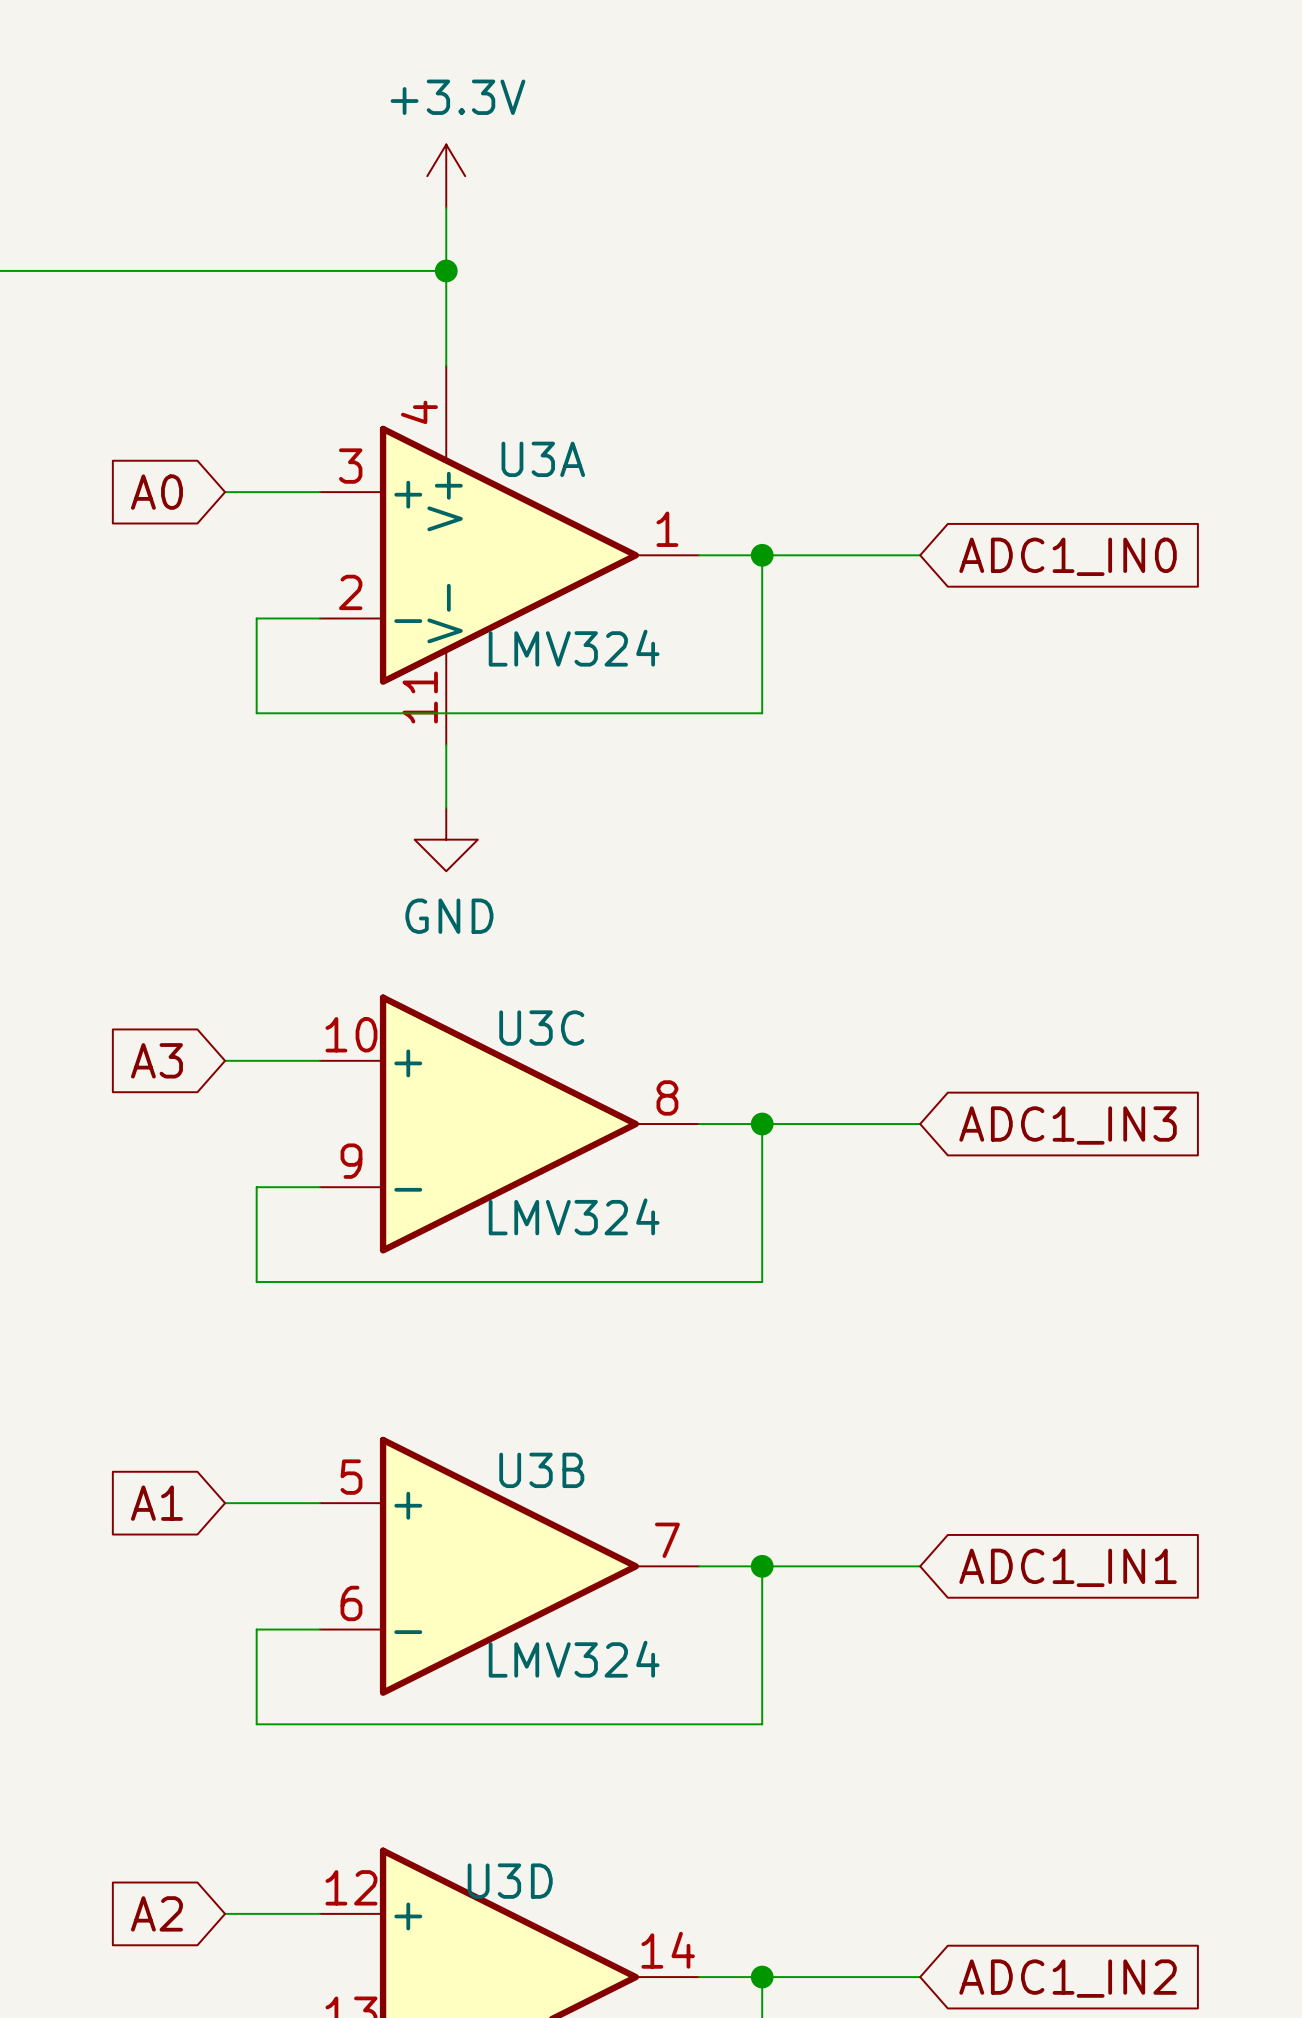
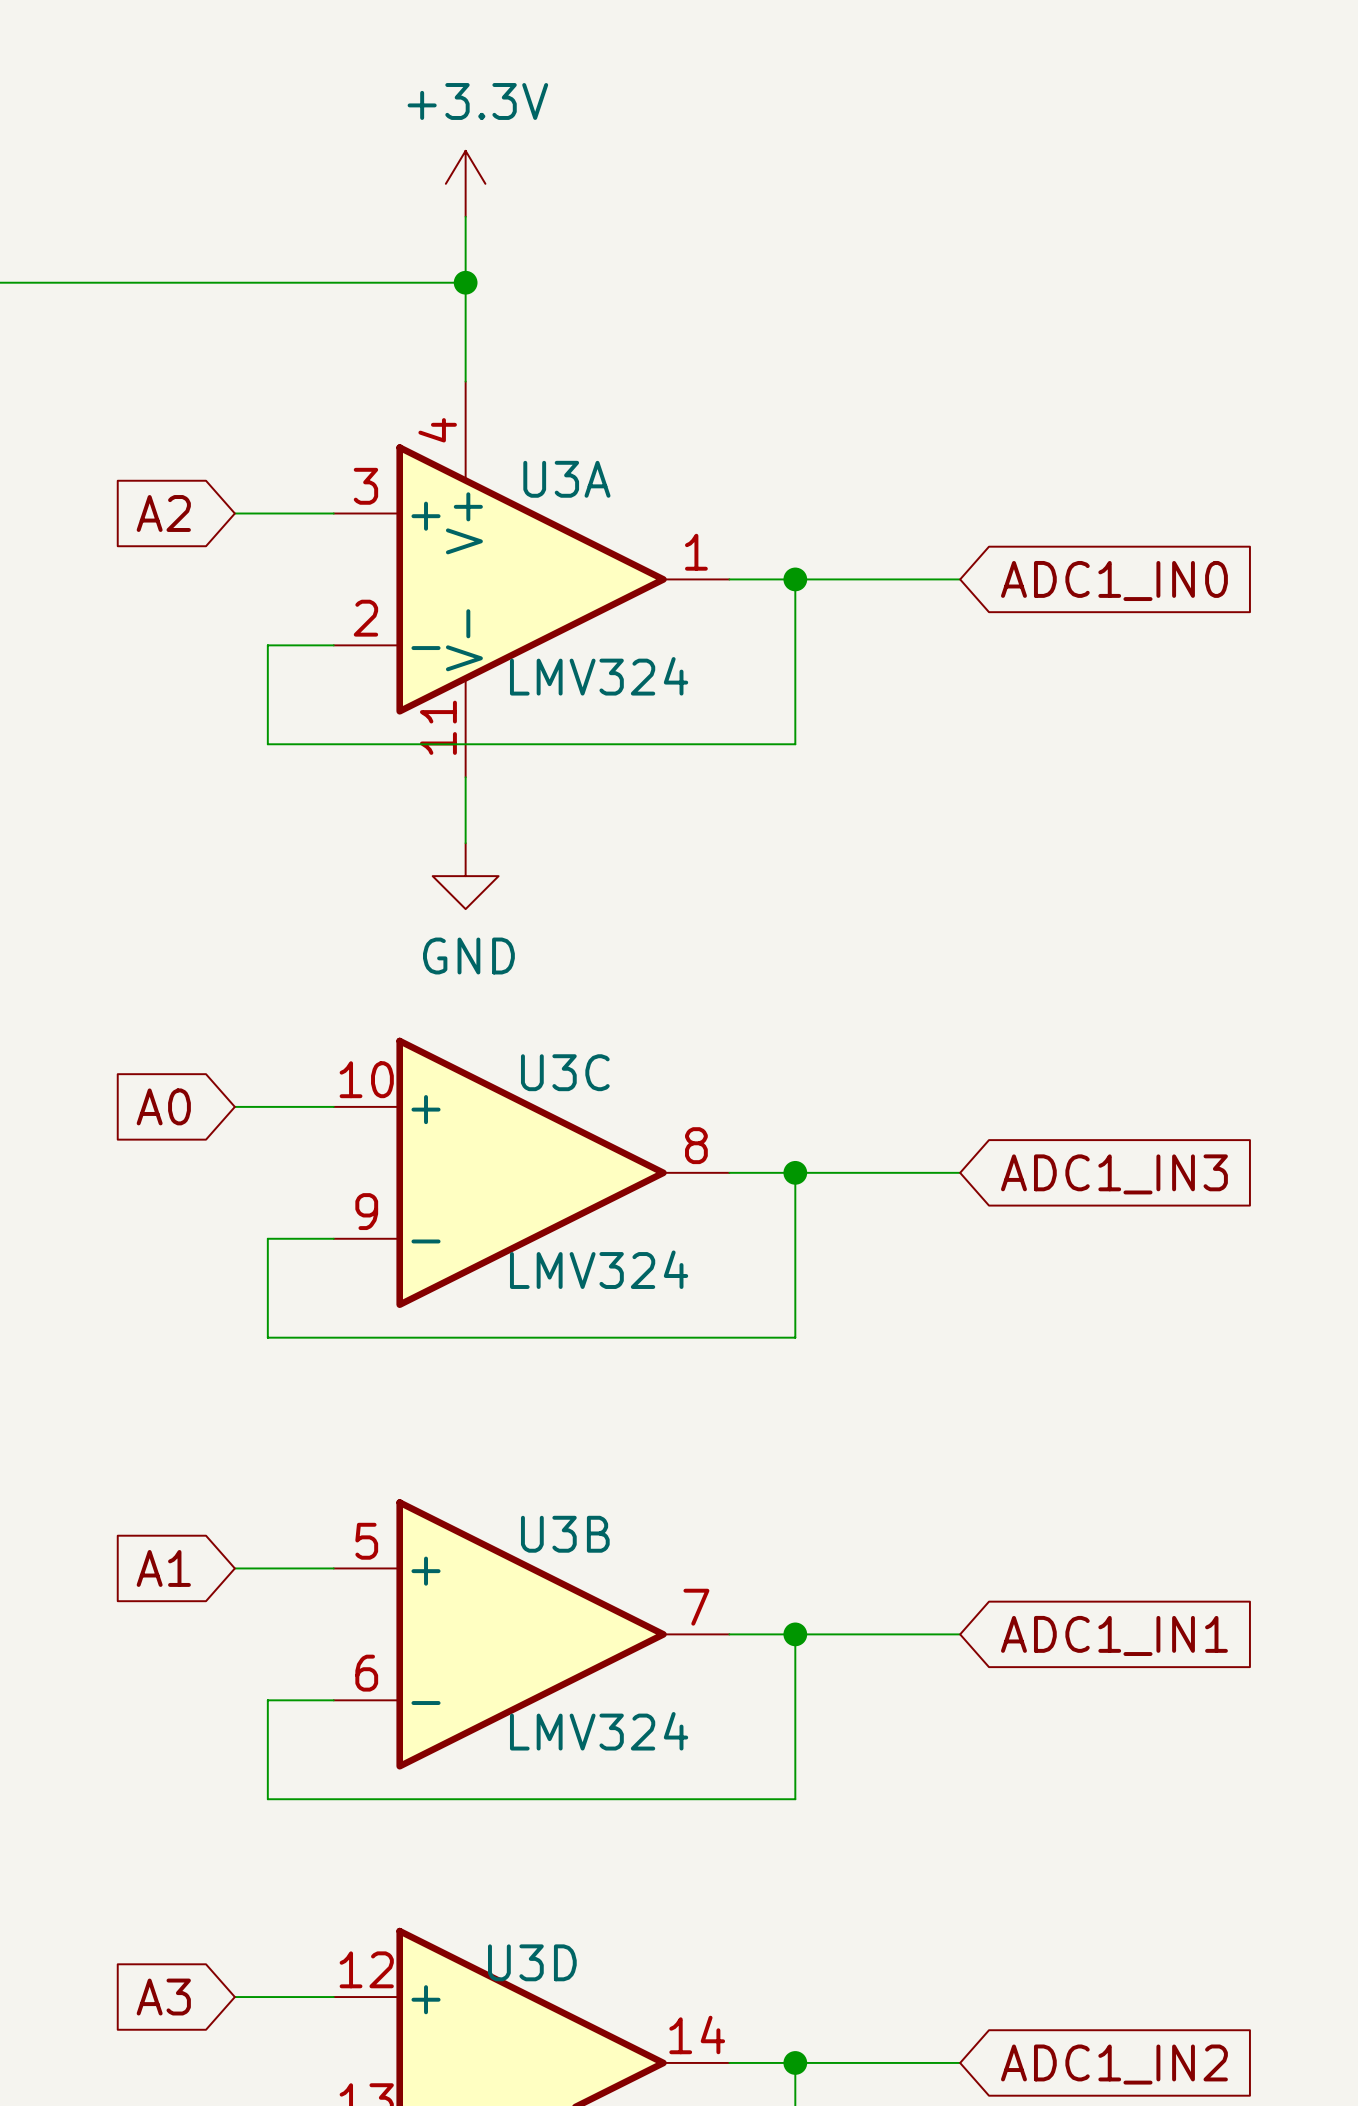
global label: A0 (156, 492) -> A2 (163, 513)
global label: A3 (156, 1060) -> A0 (163, 1106)
global label: A2 (156, 1913) -> A3 (163, 1997)

